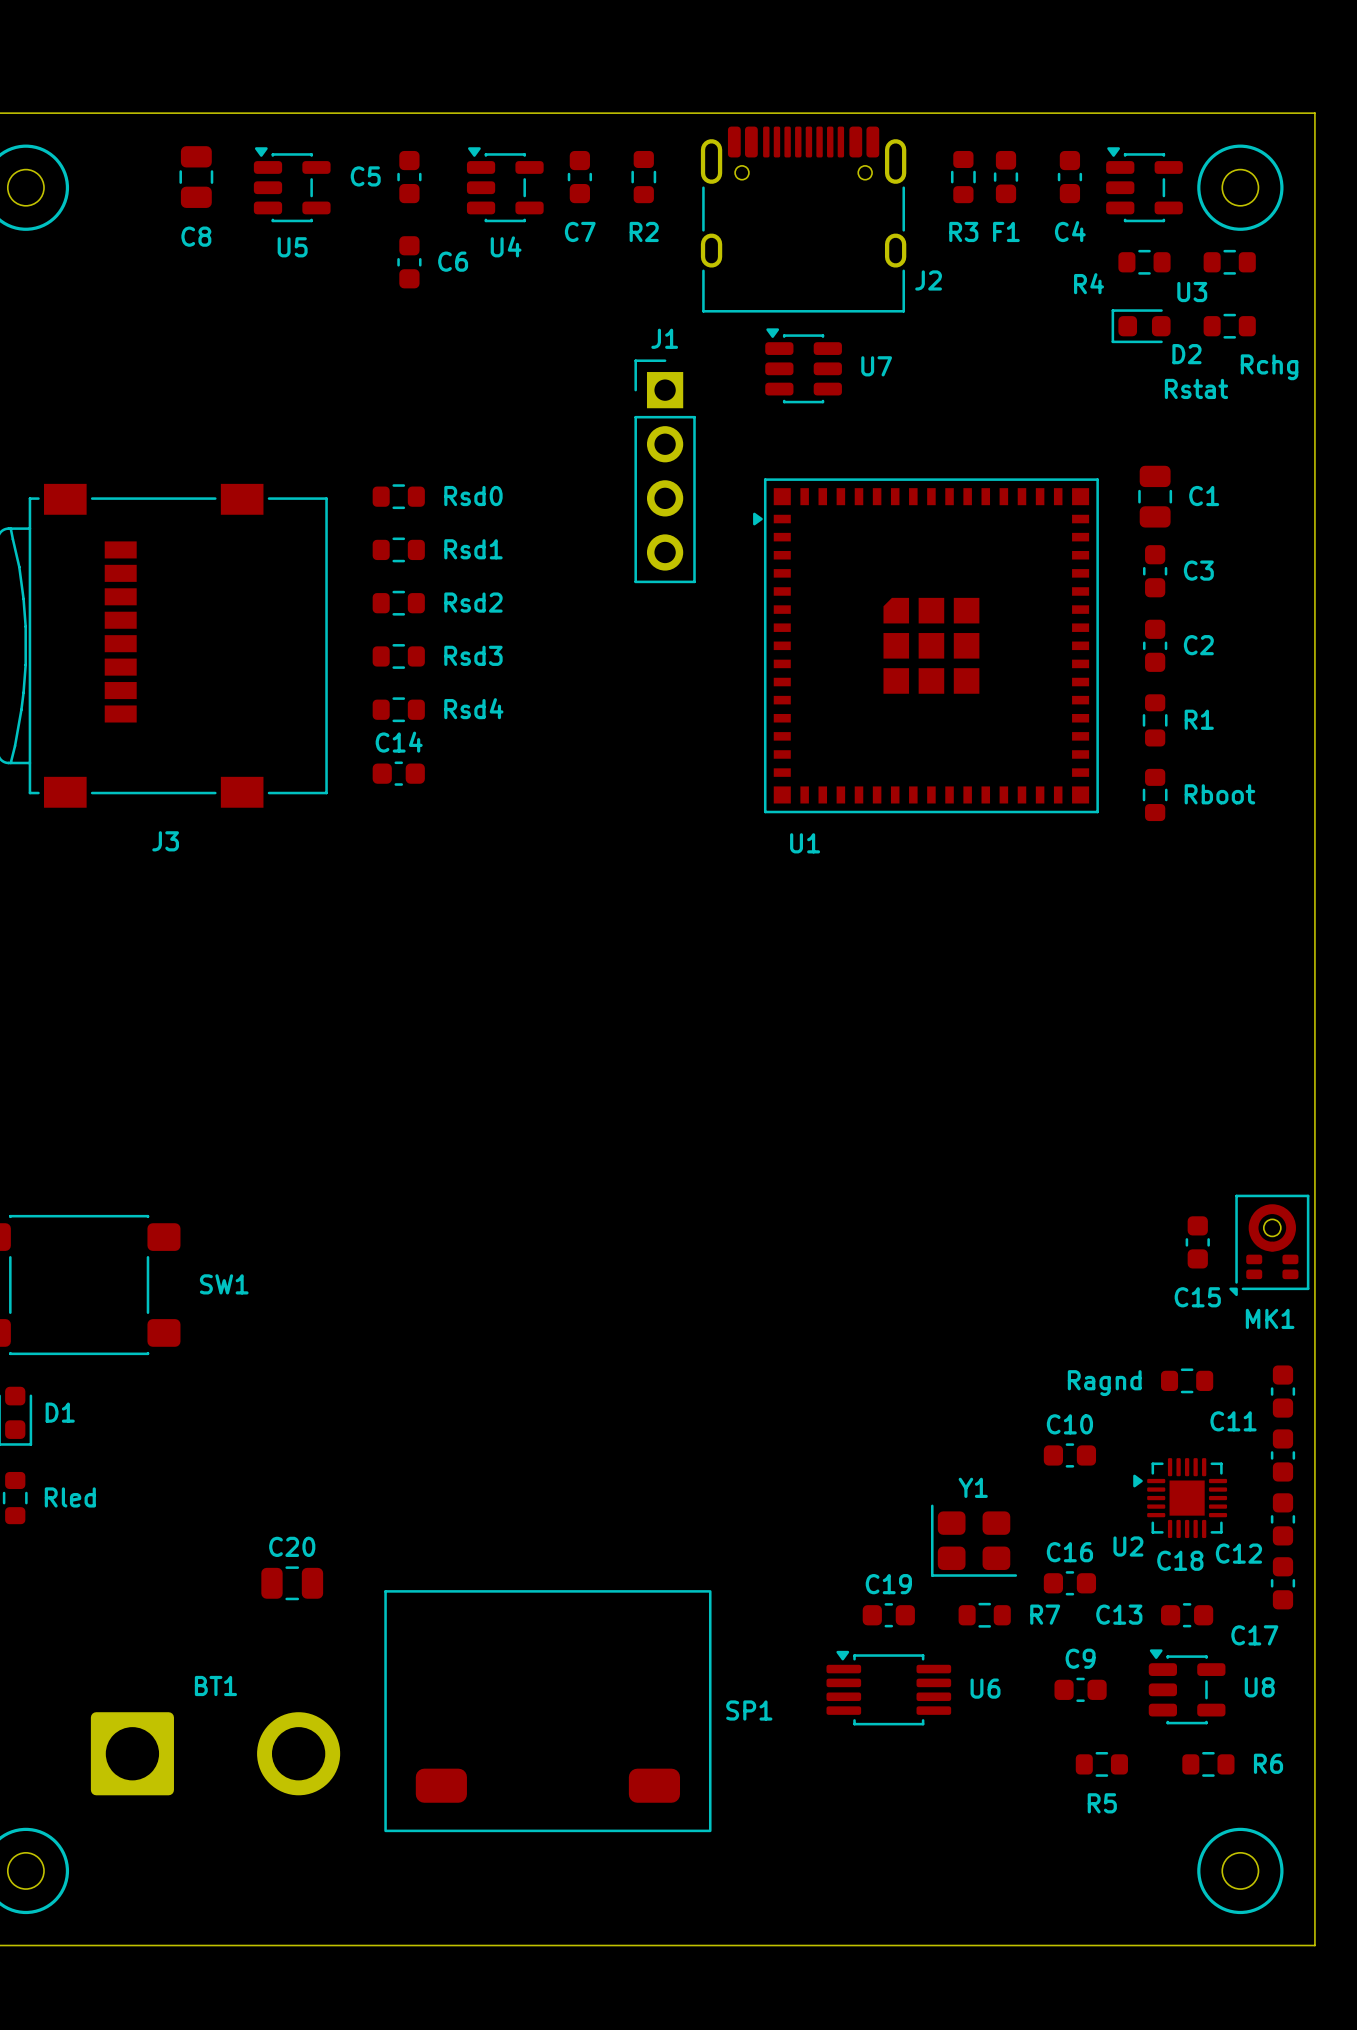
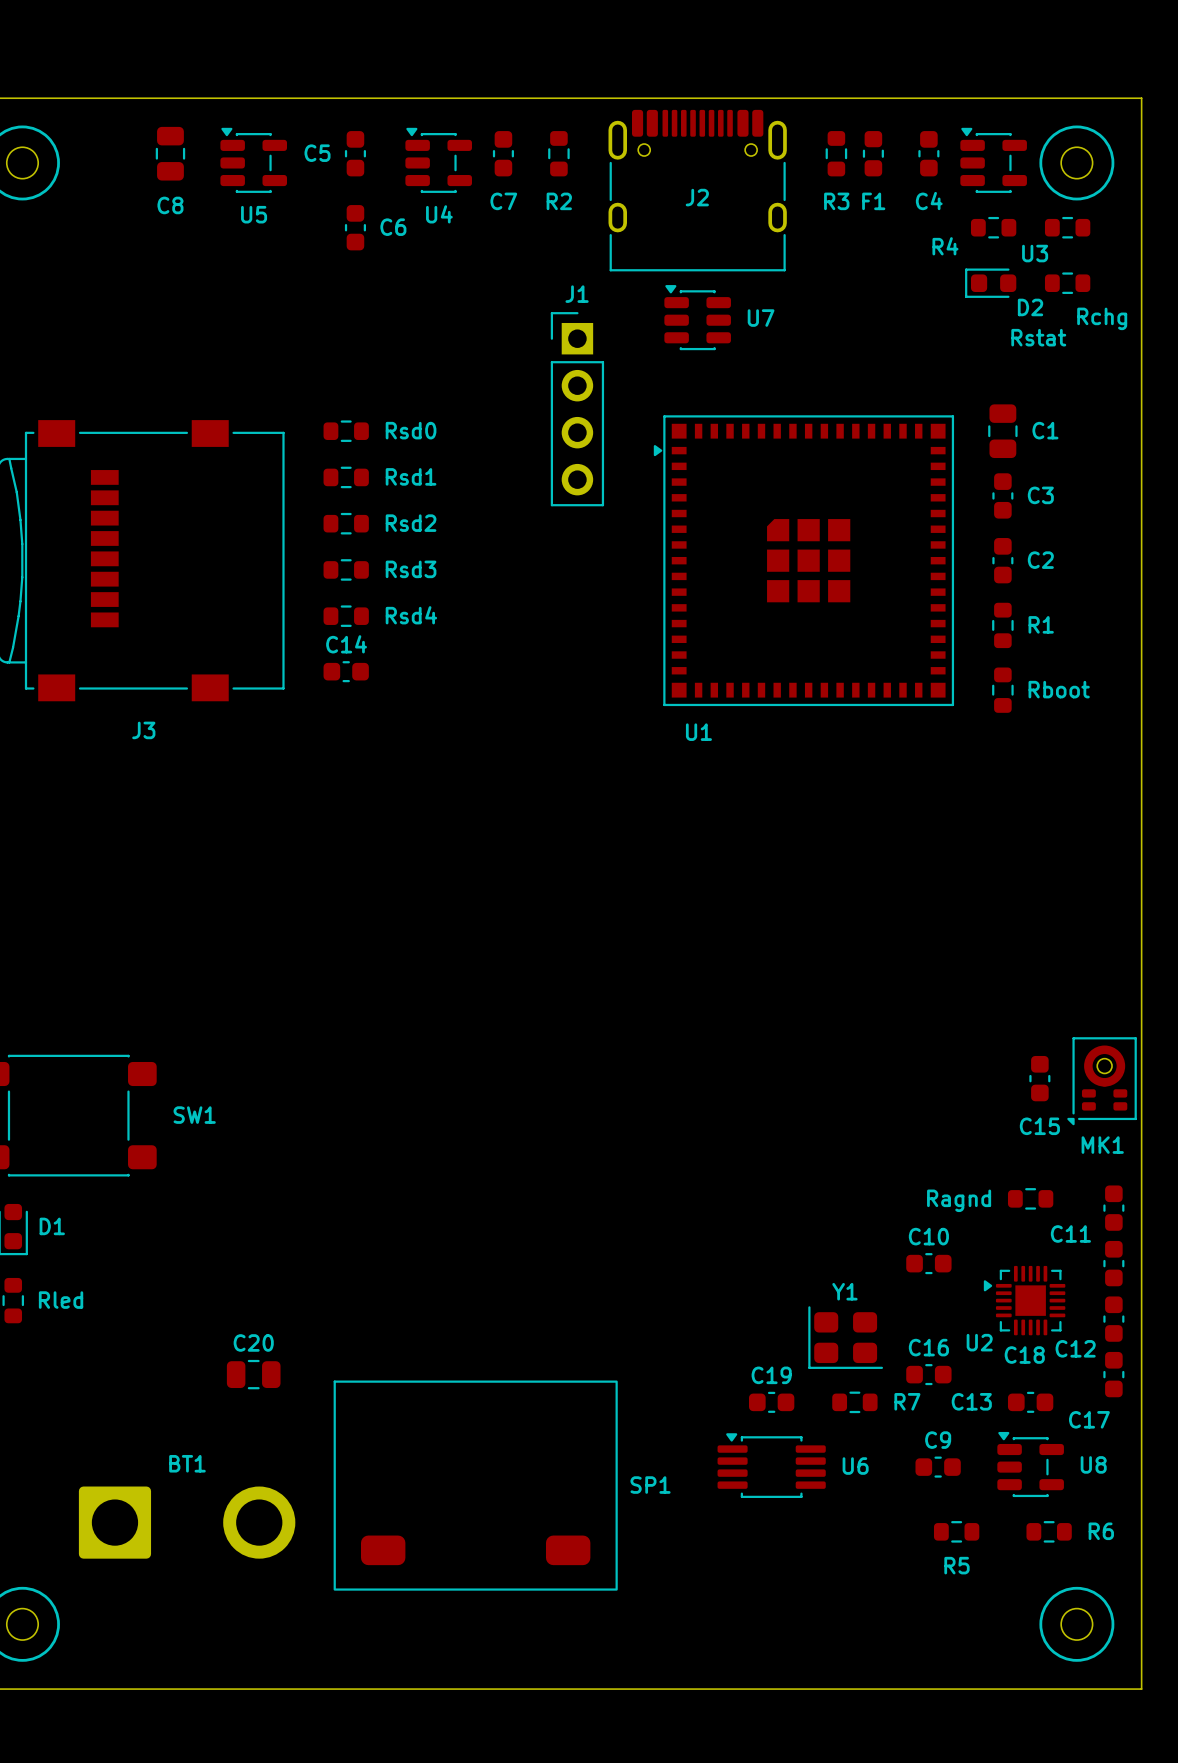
J2 name position: J2 (928, 280) -> J2 (697, 197)

